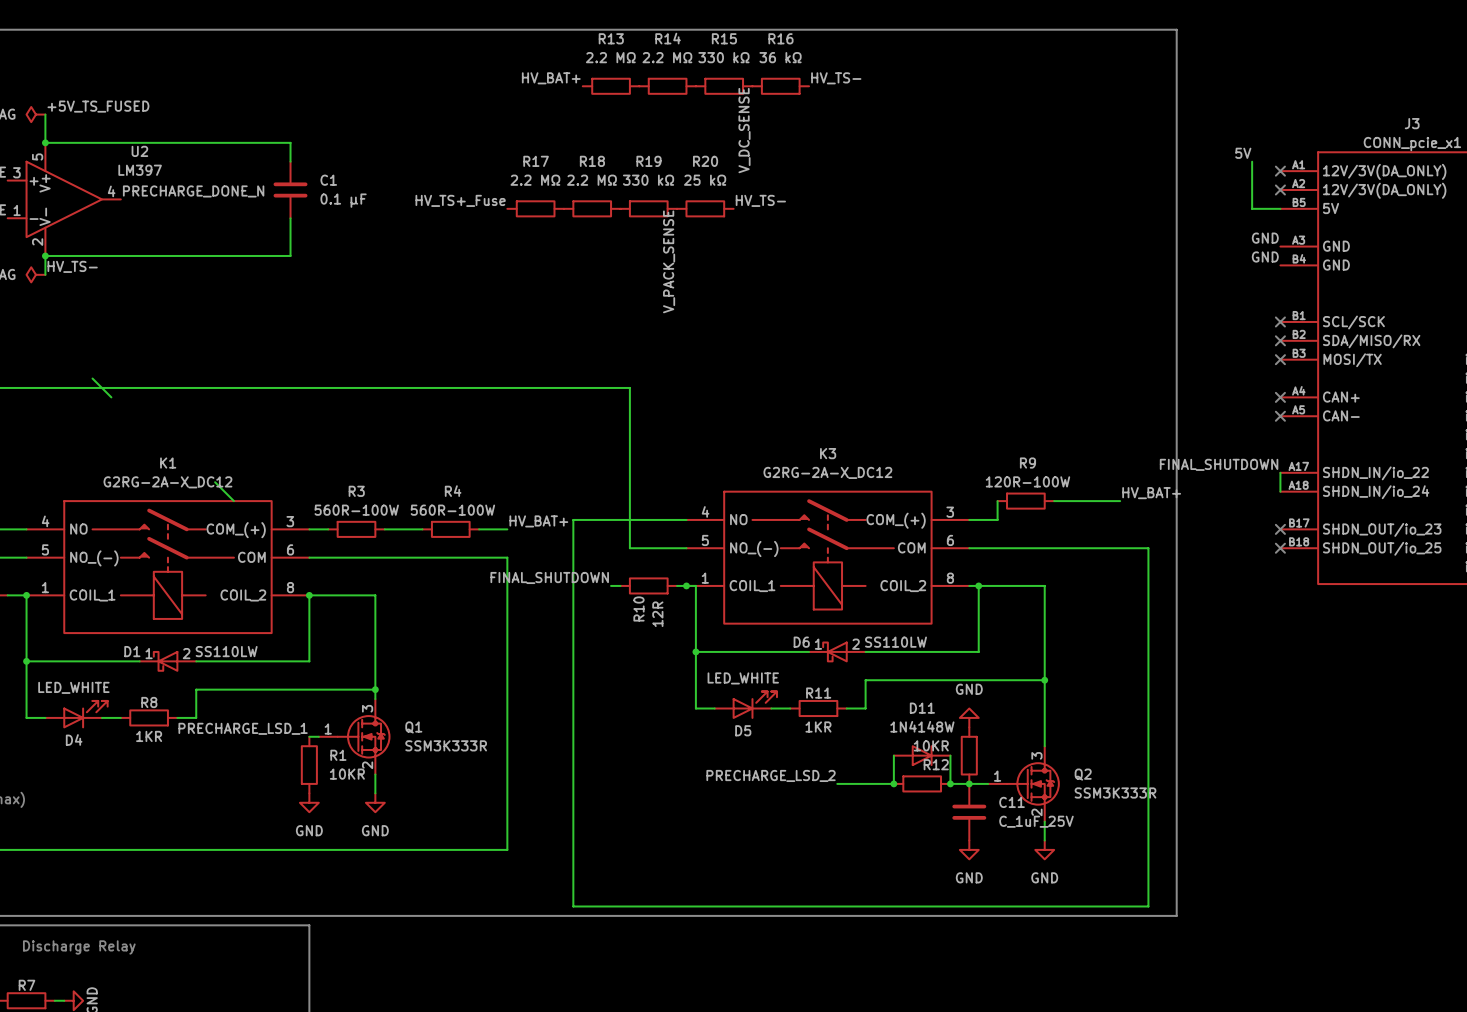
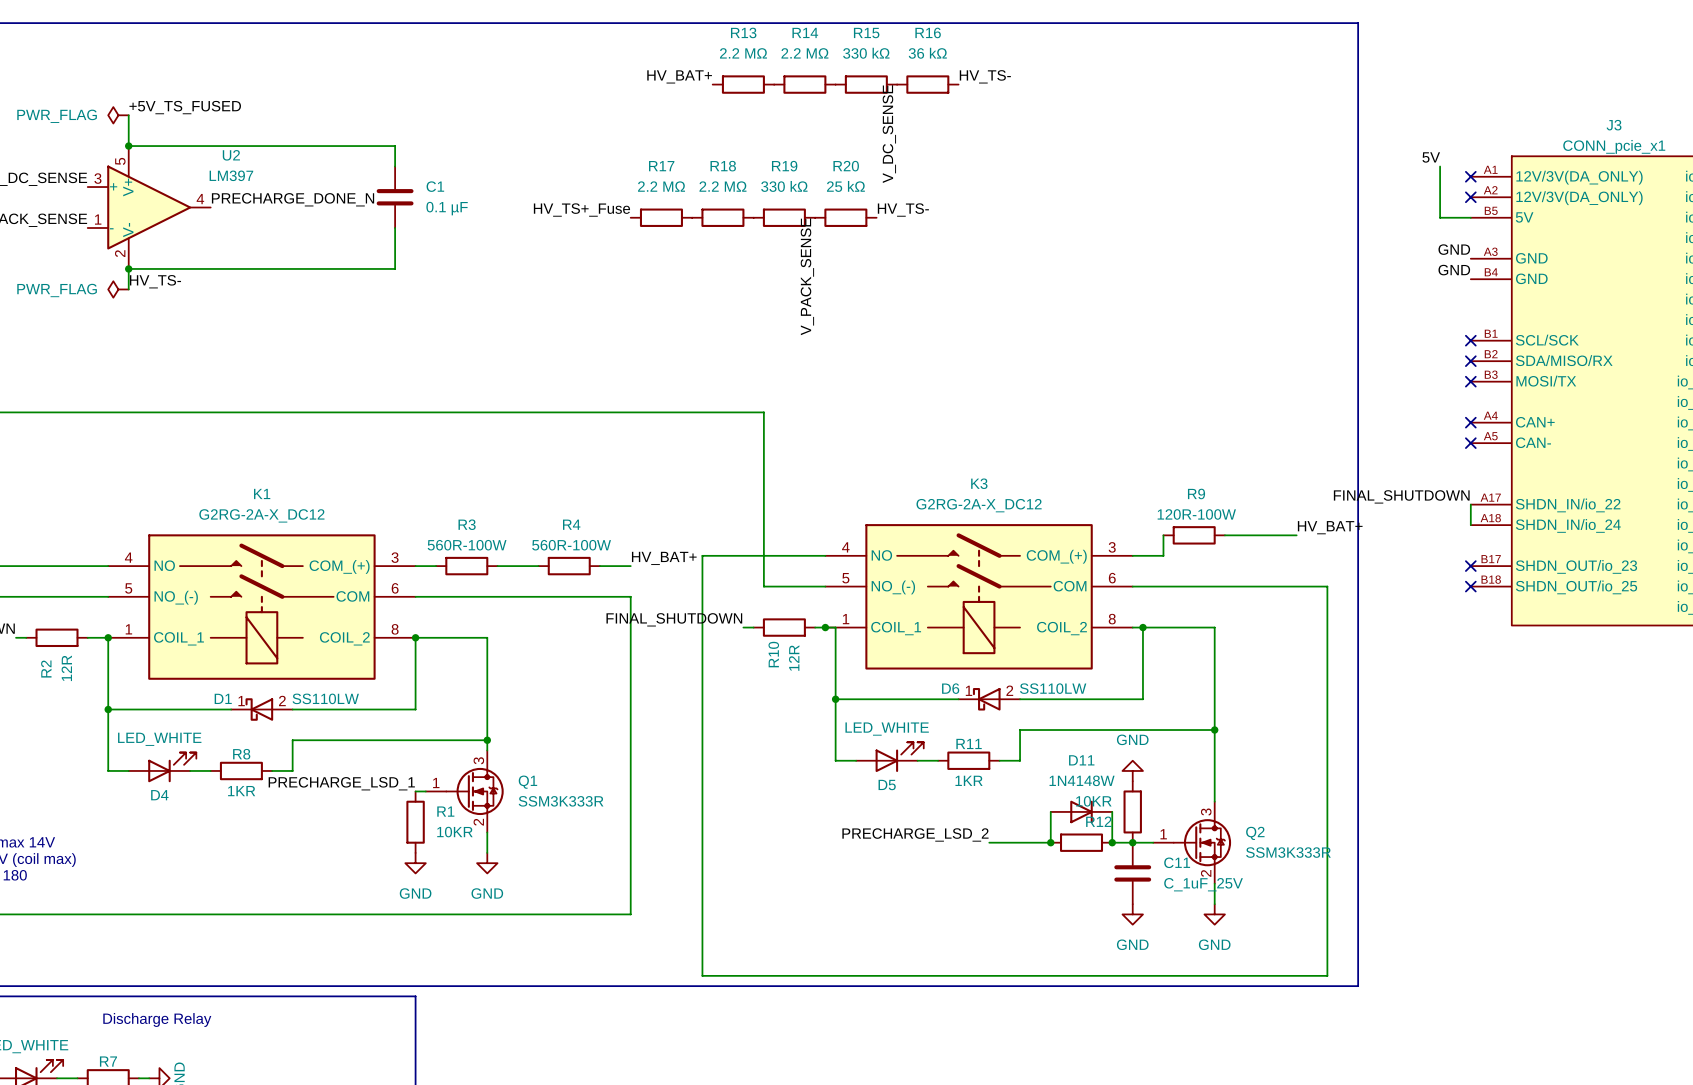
wire: (92, 378) (111, 397) -> none
wire: (215, 482) (233, 501) -> none

